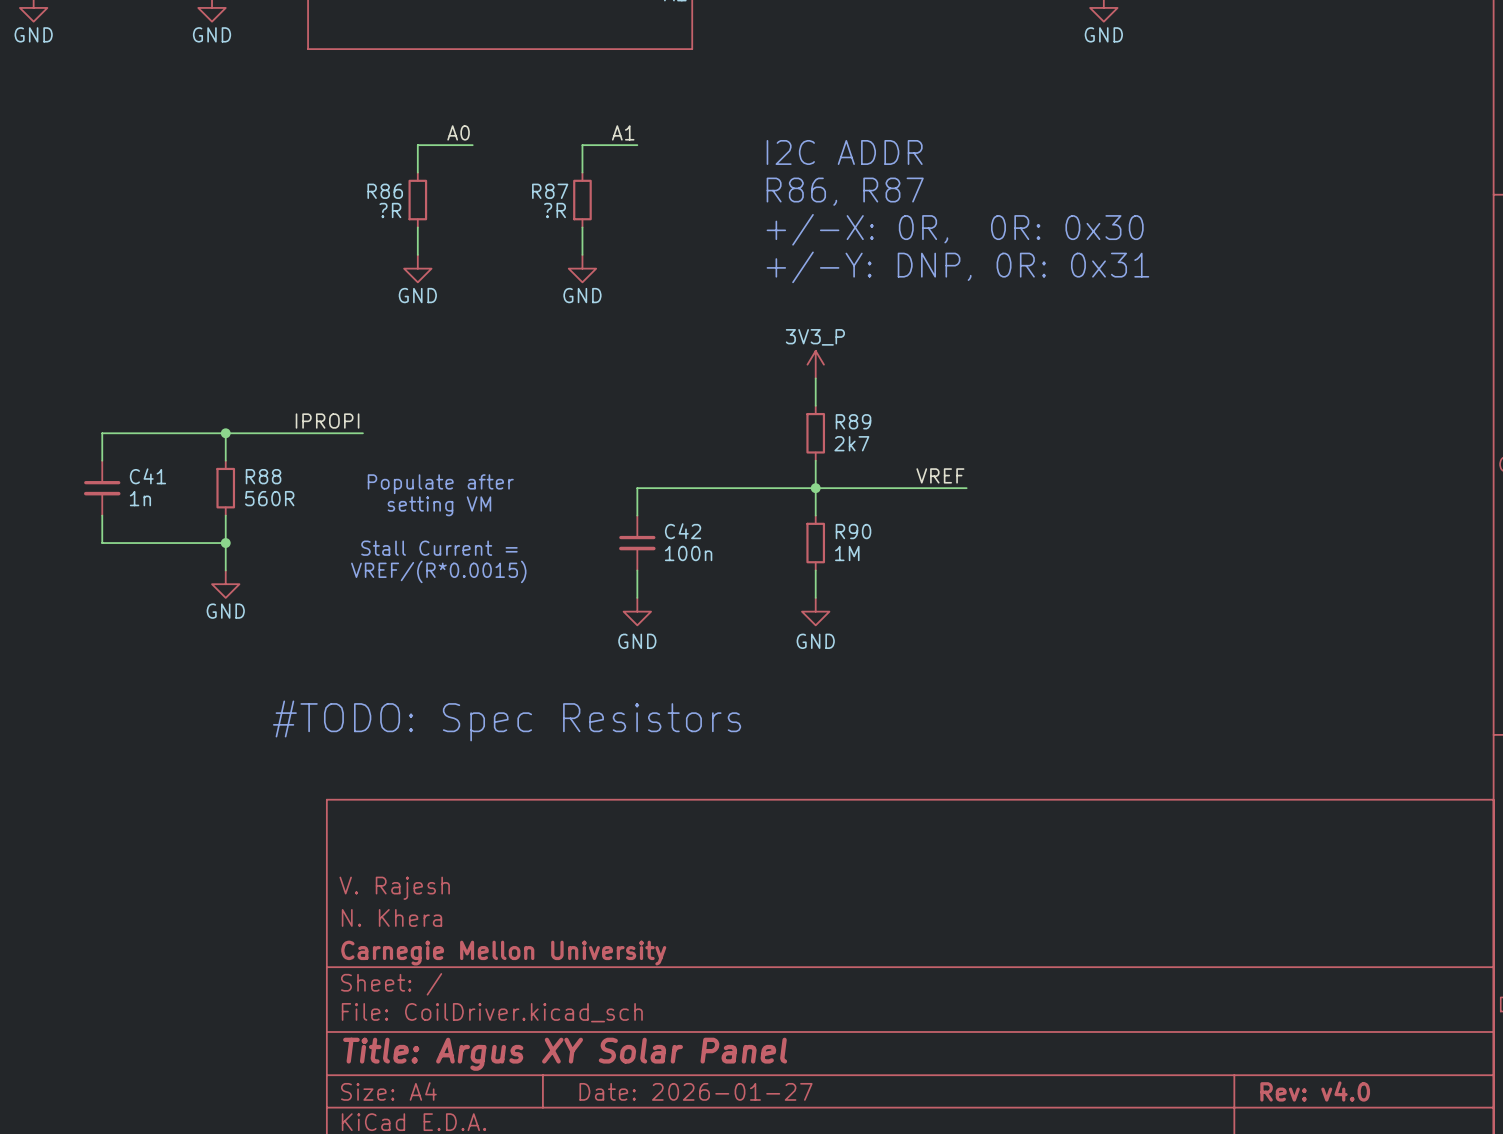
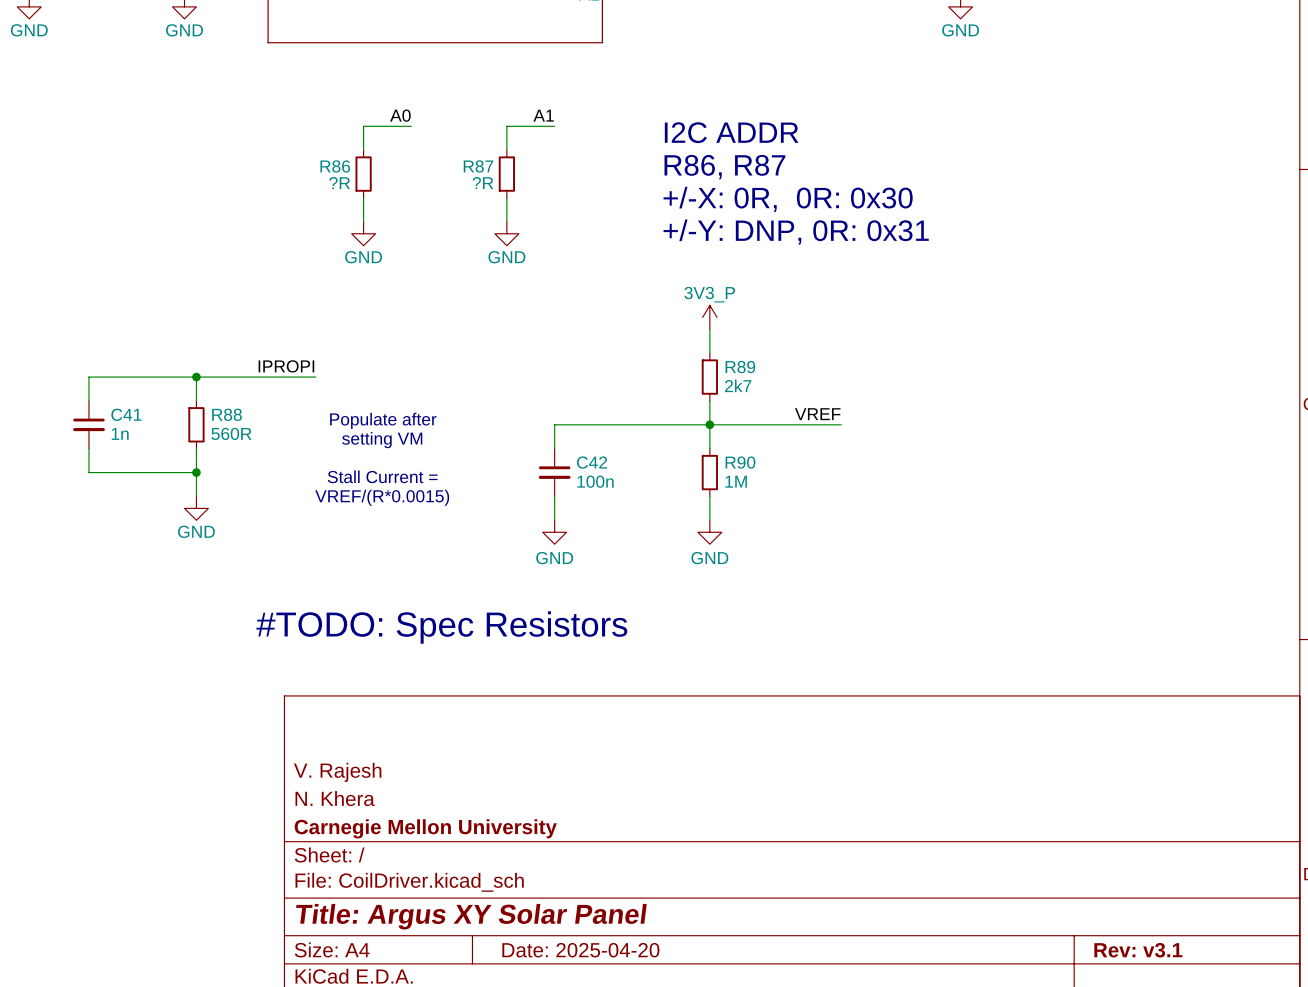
title block: Date: 2026-01-27 (696, 1091) -> Date: 2025-04-20 (580, 950)
title block: Rev: v4.0 (1315, 1091) -> Rev: v3.1 (1138, 950)

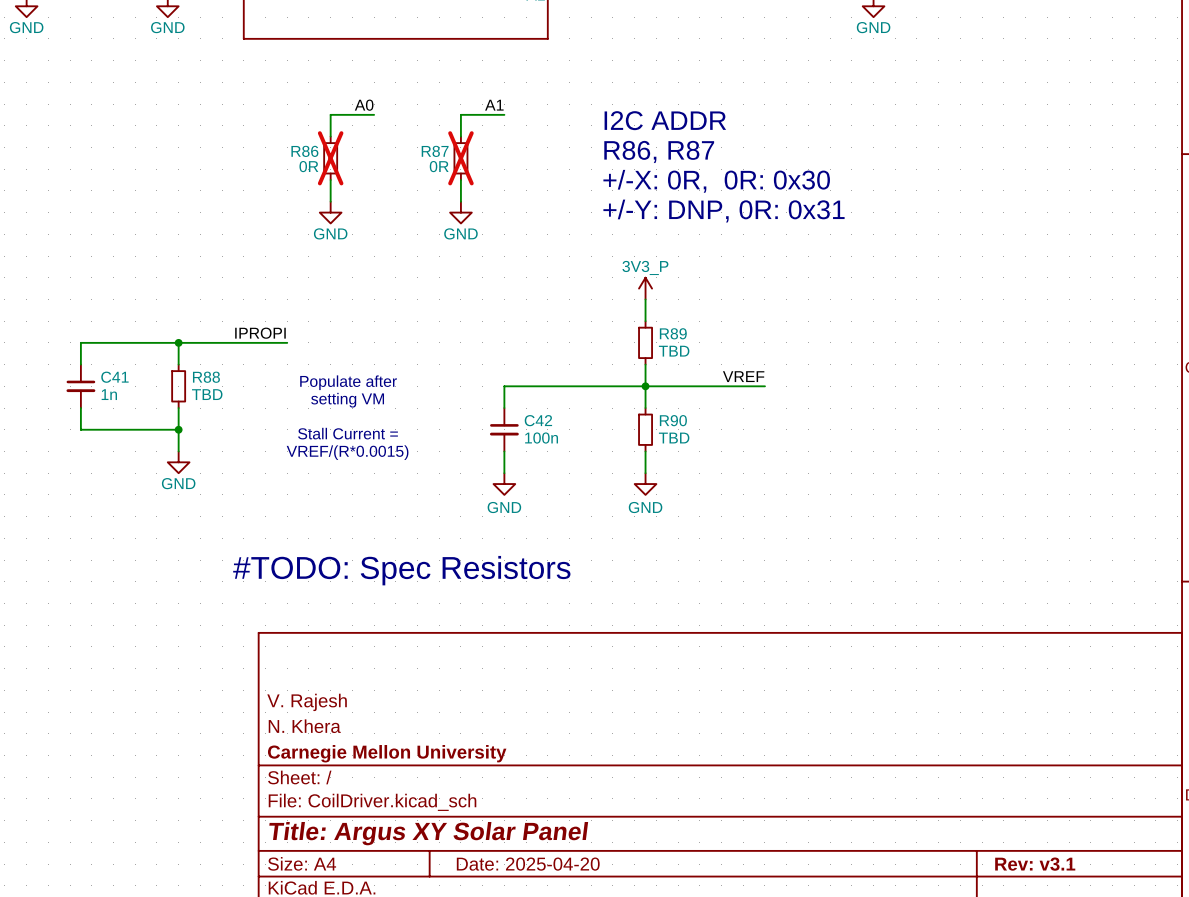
R86 do-not-place cross: none -> (330, 158)
R87 do-not-place cross: none -> (460, 158)
R86 value: ?R (339, 183) -> 0R (308, 166)
R87 value: ?R (482, 183) -> 0R (439, 166)
R89 value: 2k7 (738, 385) -> TBD (674, 351)
R88 value: 560R (231, 433) -> TBD (207, 394)
R90 value: 1M (736, 481) -> TBD (674, 438)

